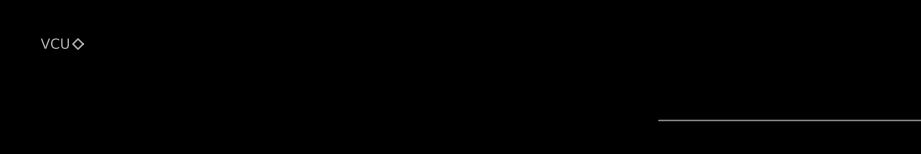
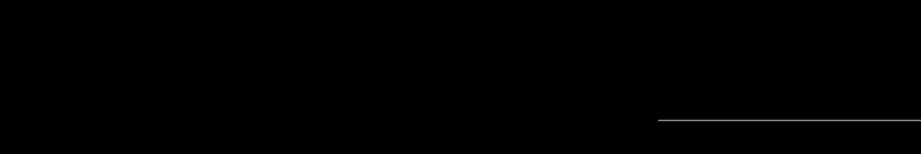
hierarchical label: VCU (54, 43) -> none

